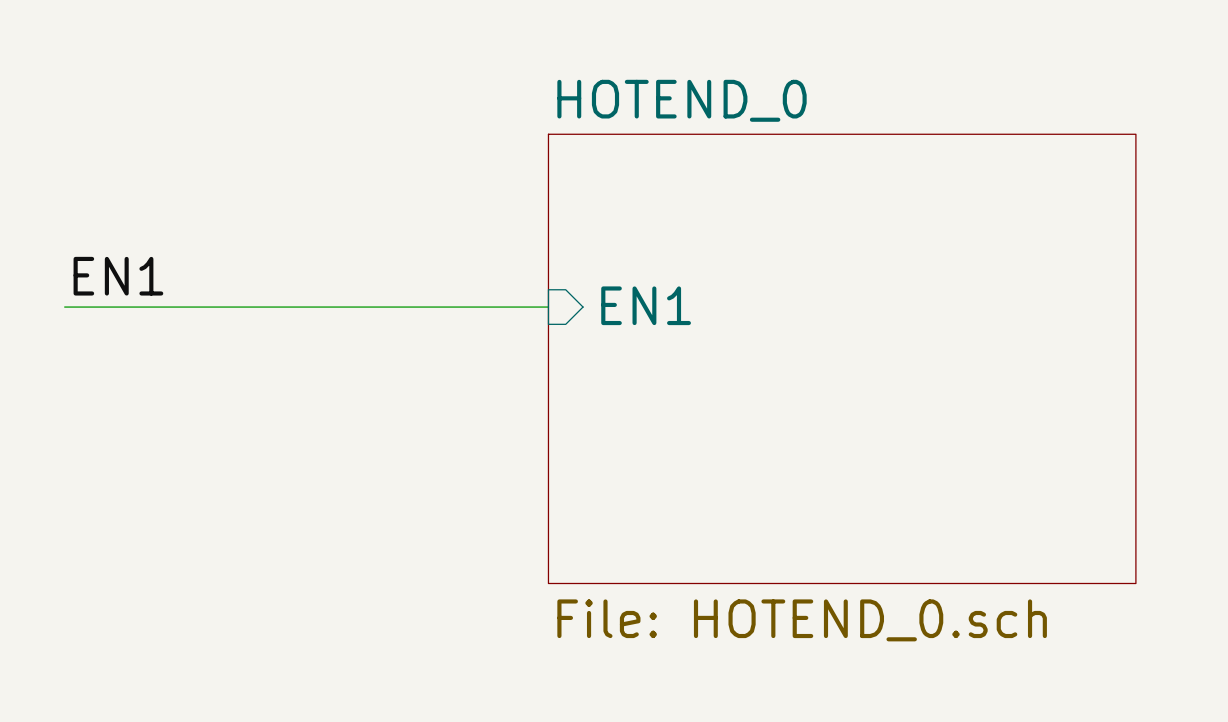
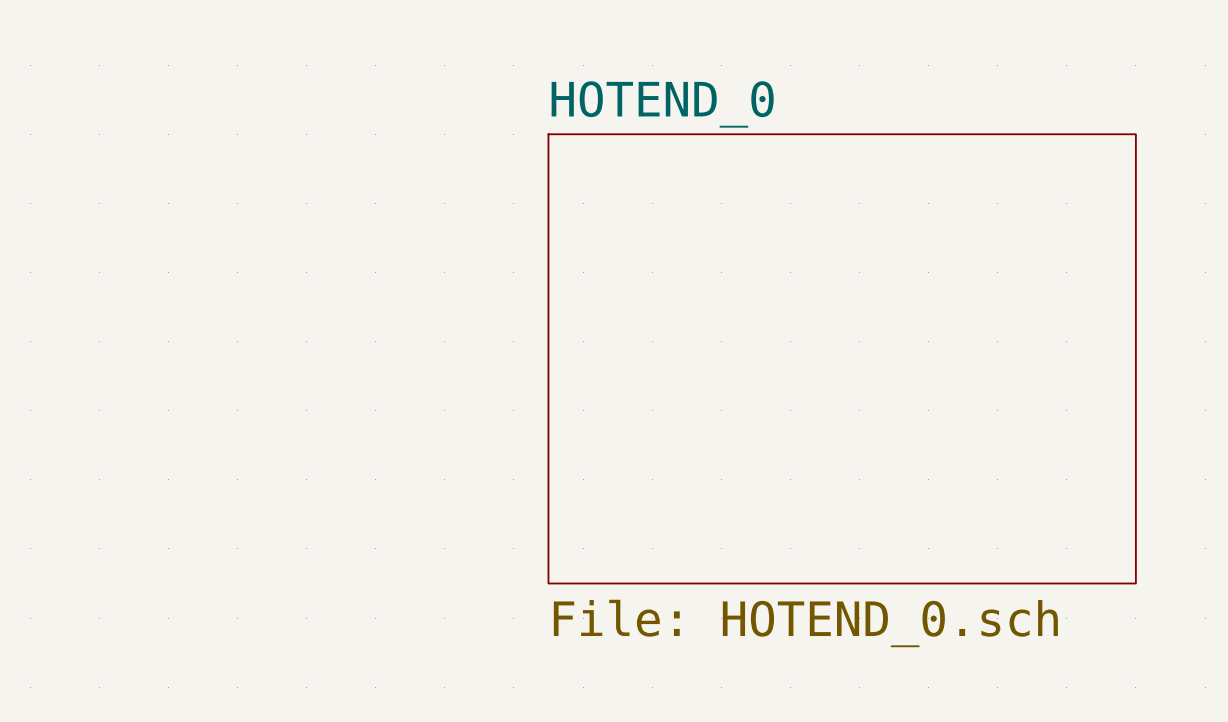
label: EN1 (118, 276) -> none
sheet pin: EN1 (646, 305) -> none
wire: (64, 307) (548, 307) -> none

